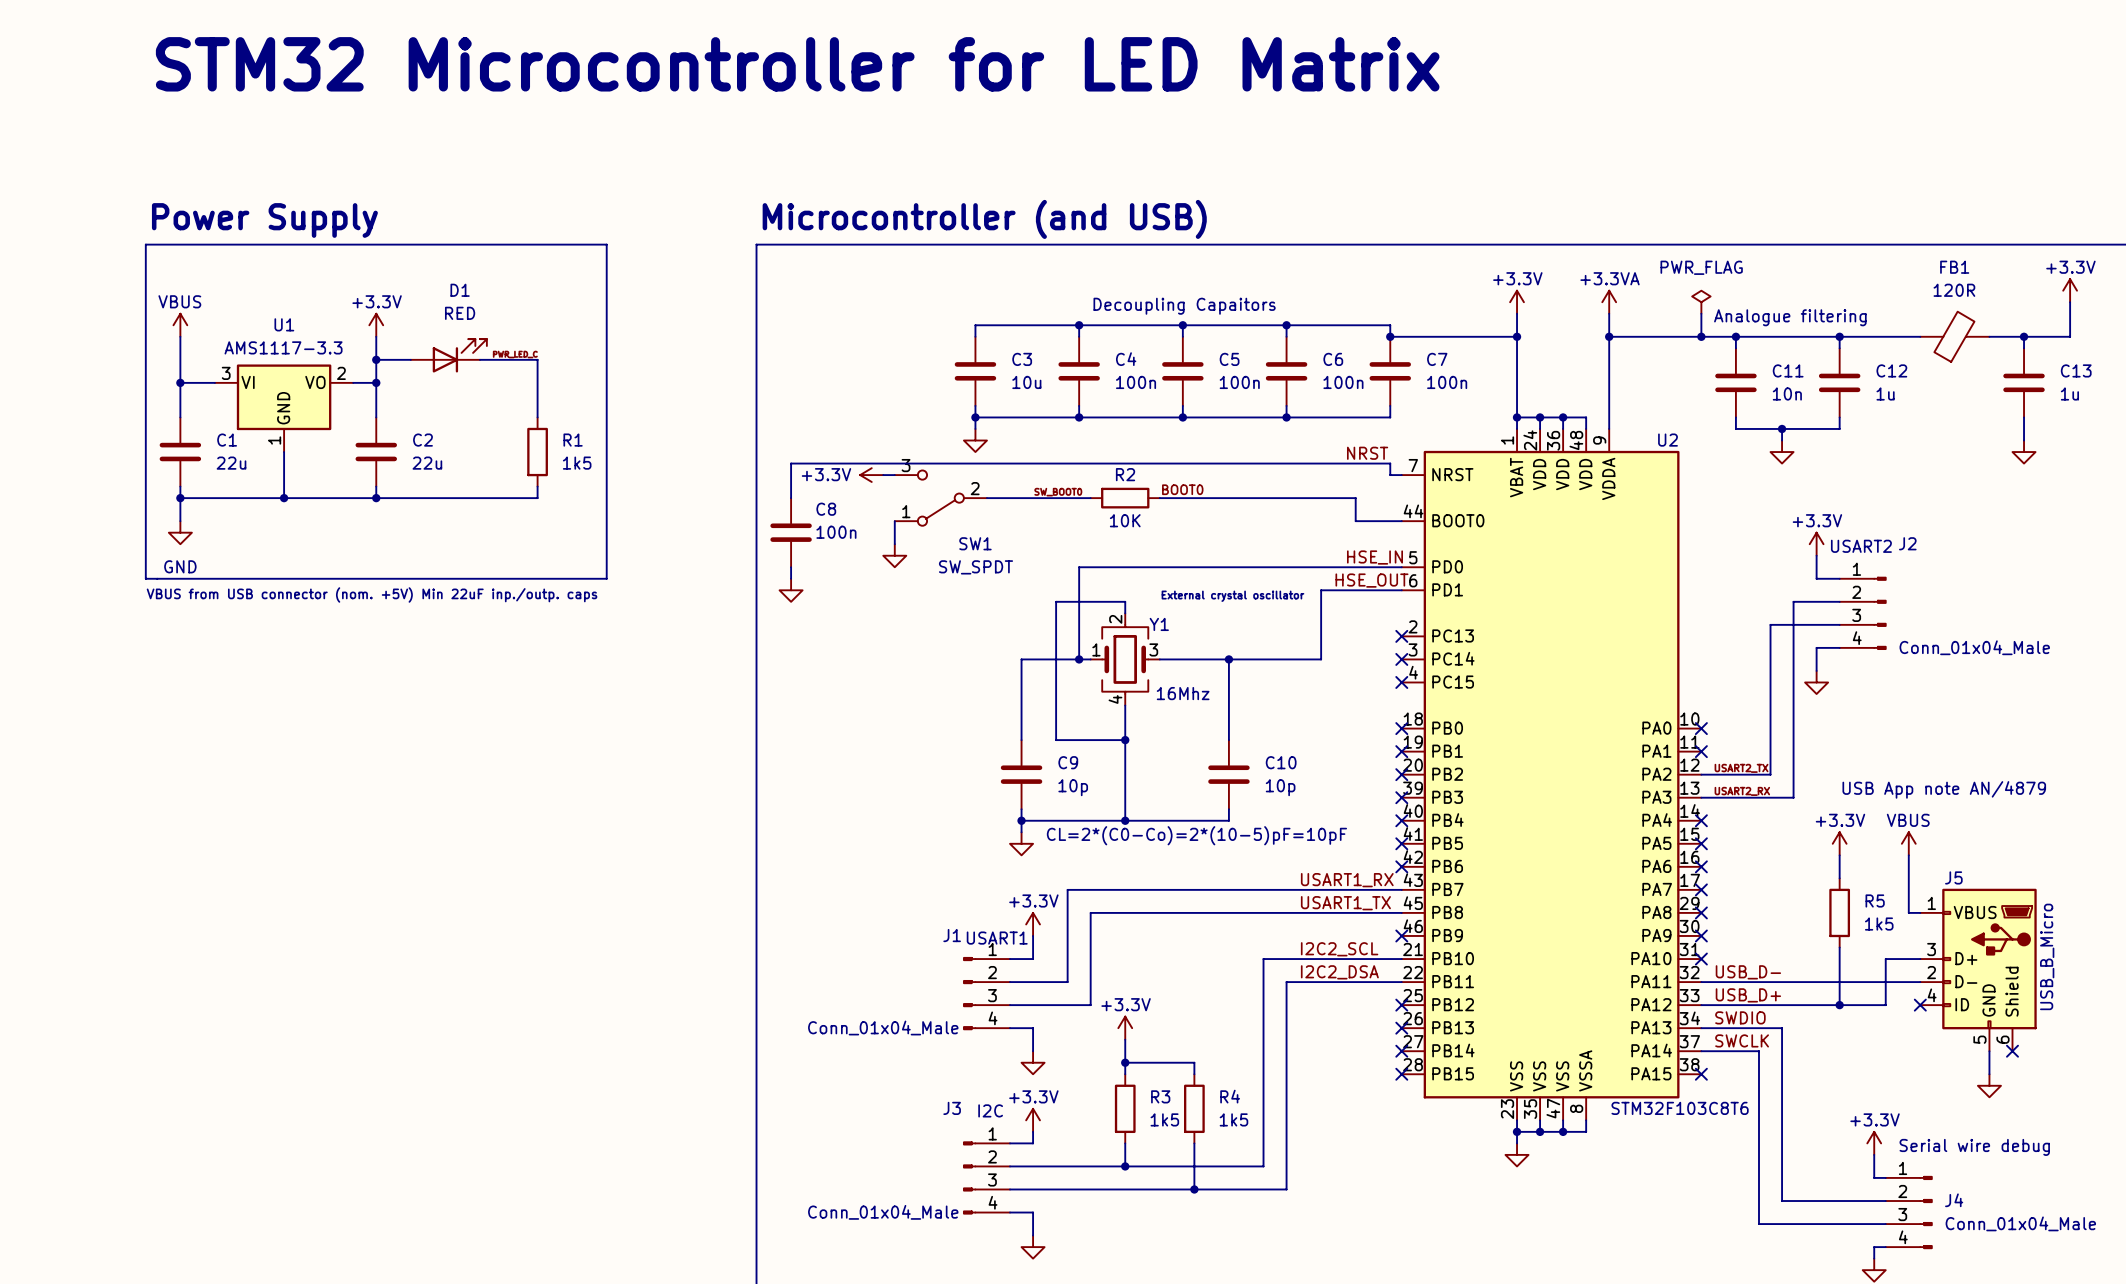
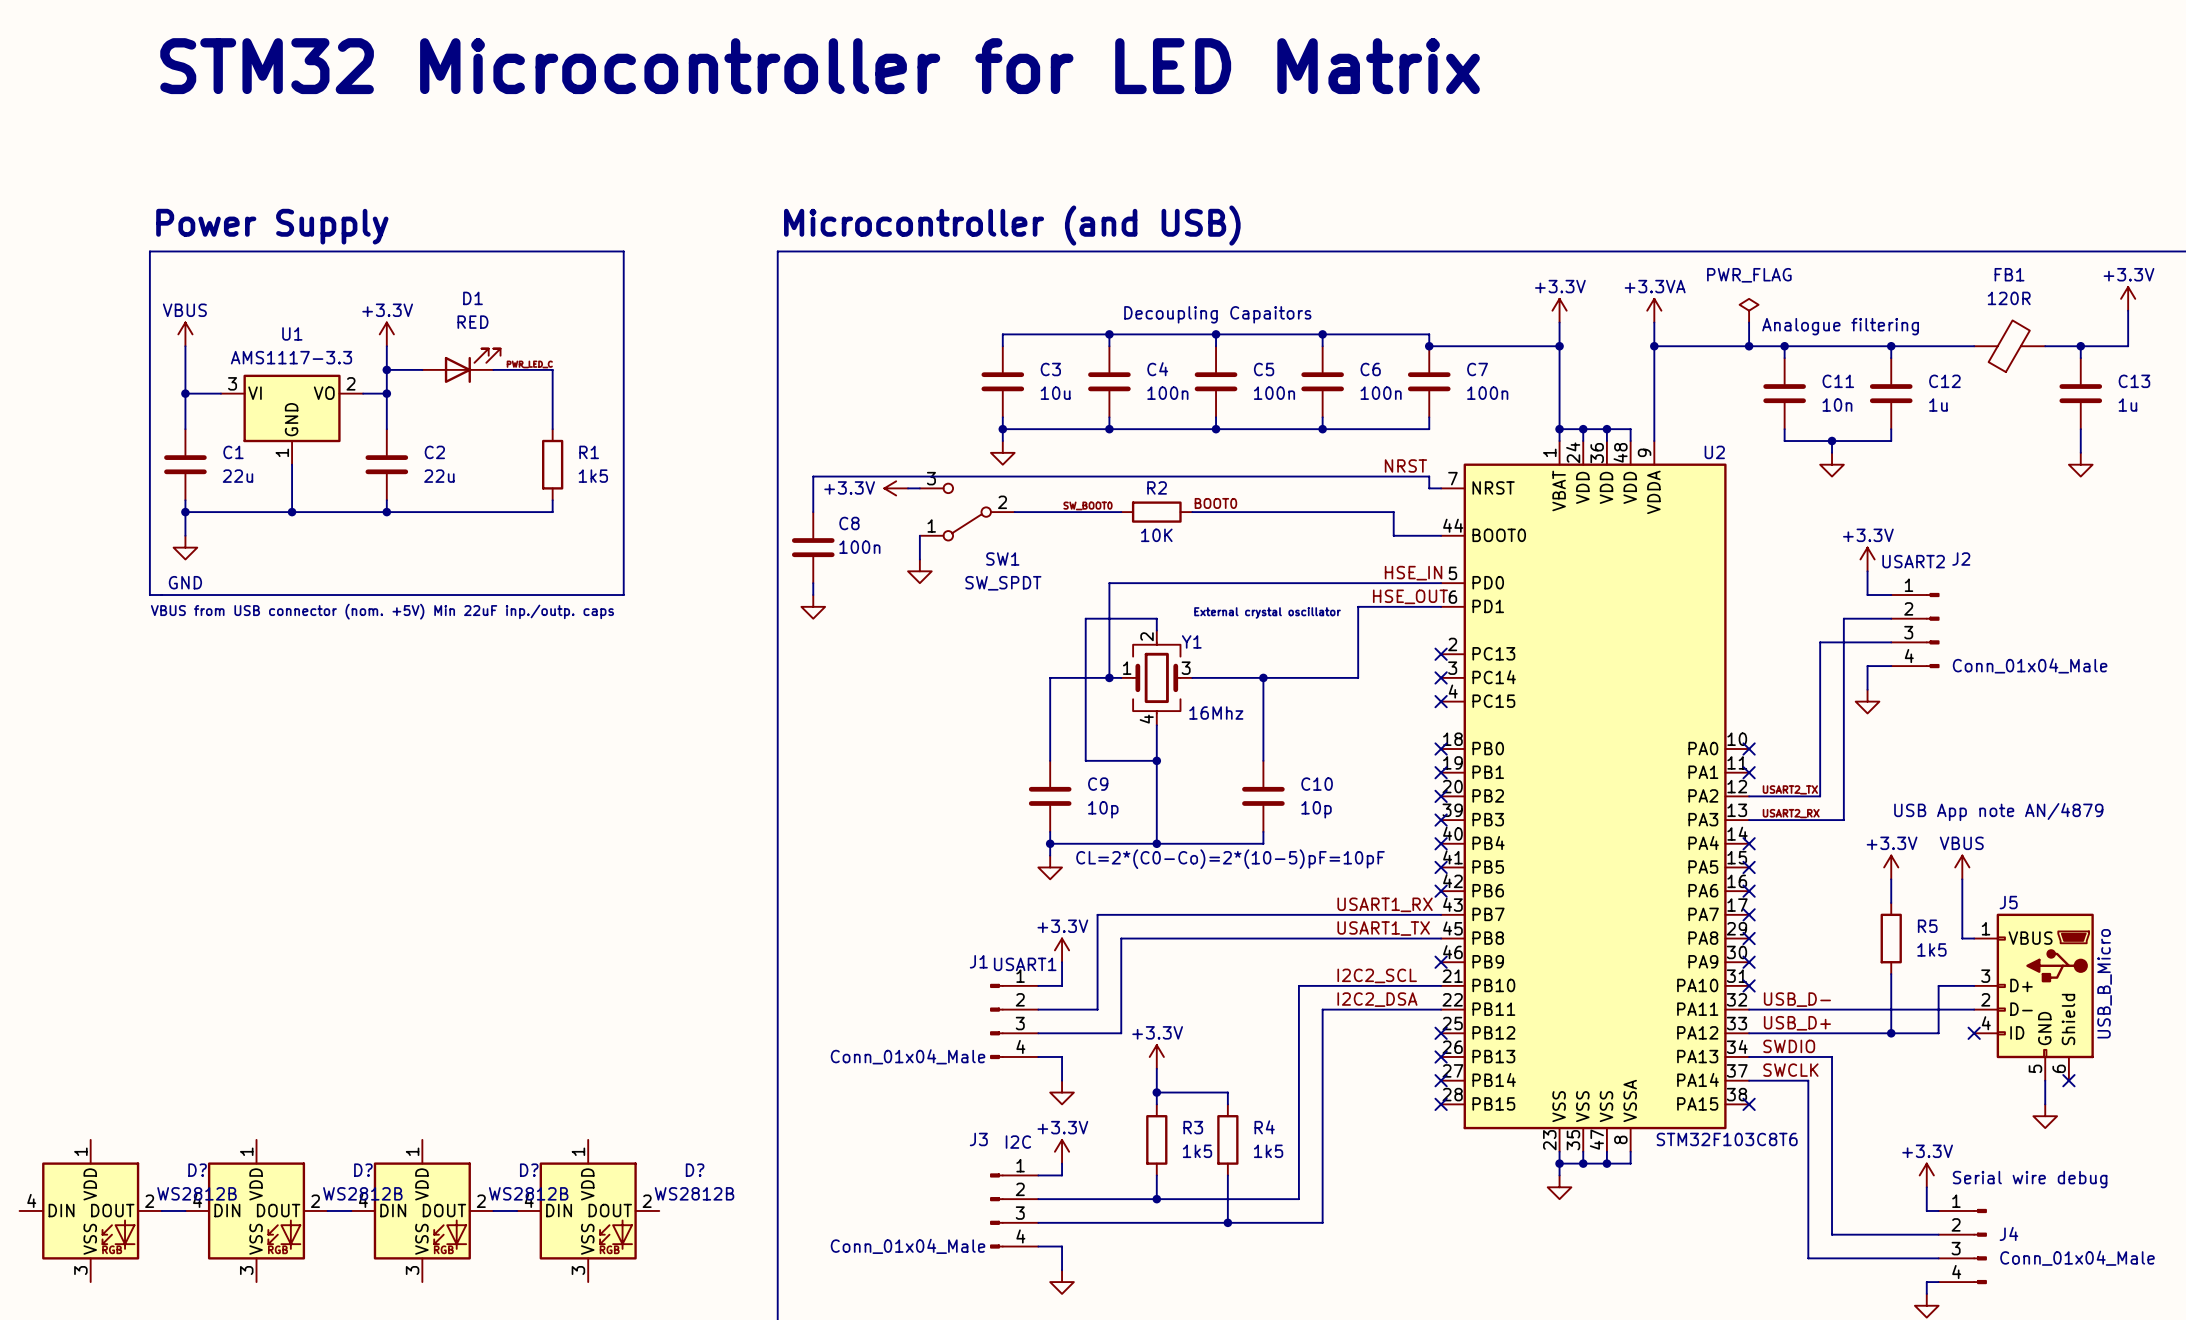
D?: none -> WS2812B (90, 1210)
wire: none -> (161, 1210) (185, 1210)
D?: none -> WS2812B (256, 1210)
wire: none -> (327, 1210) (351, 1210)
D?: none -> WS2812B (422, 1210)
wire: none -> (493, 1210) (517, 1210)
D?: none -> WS2812B (588, 1210)

